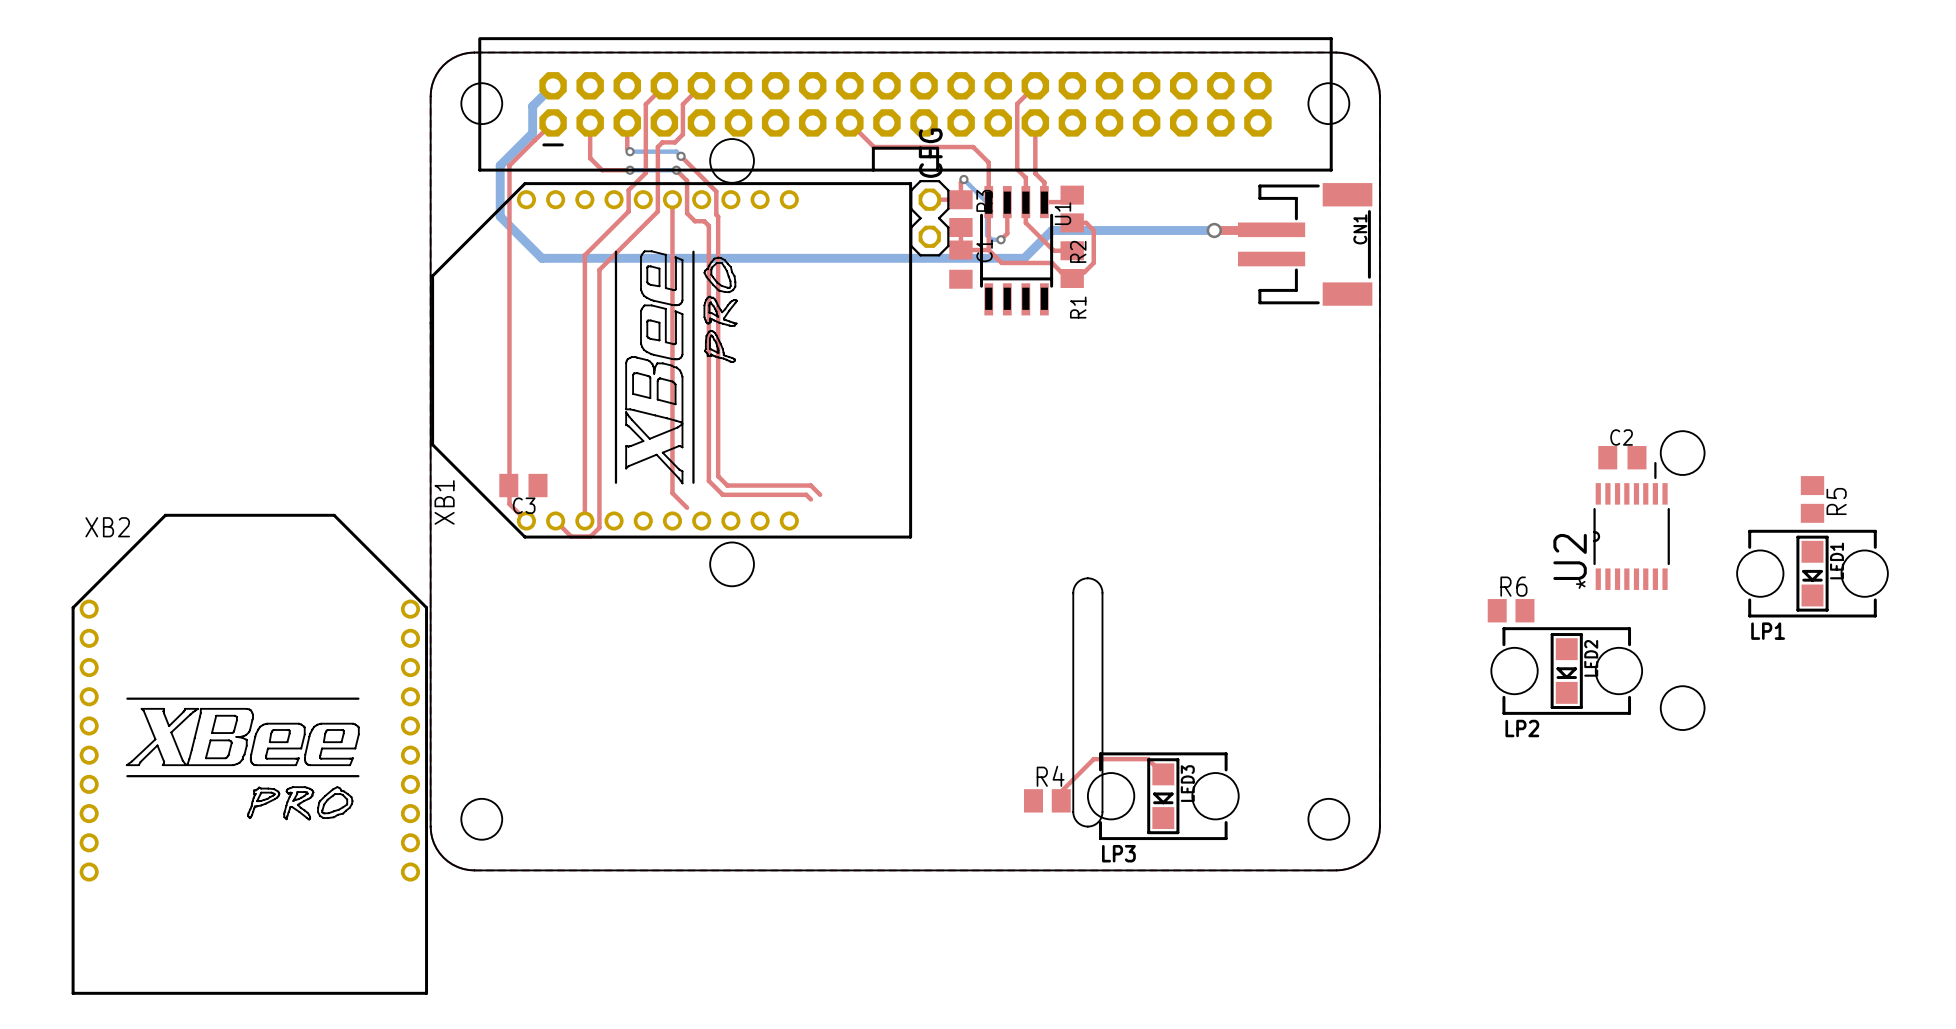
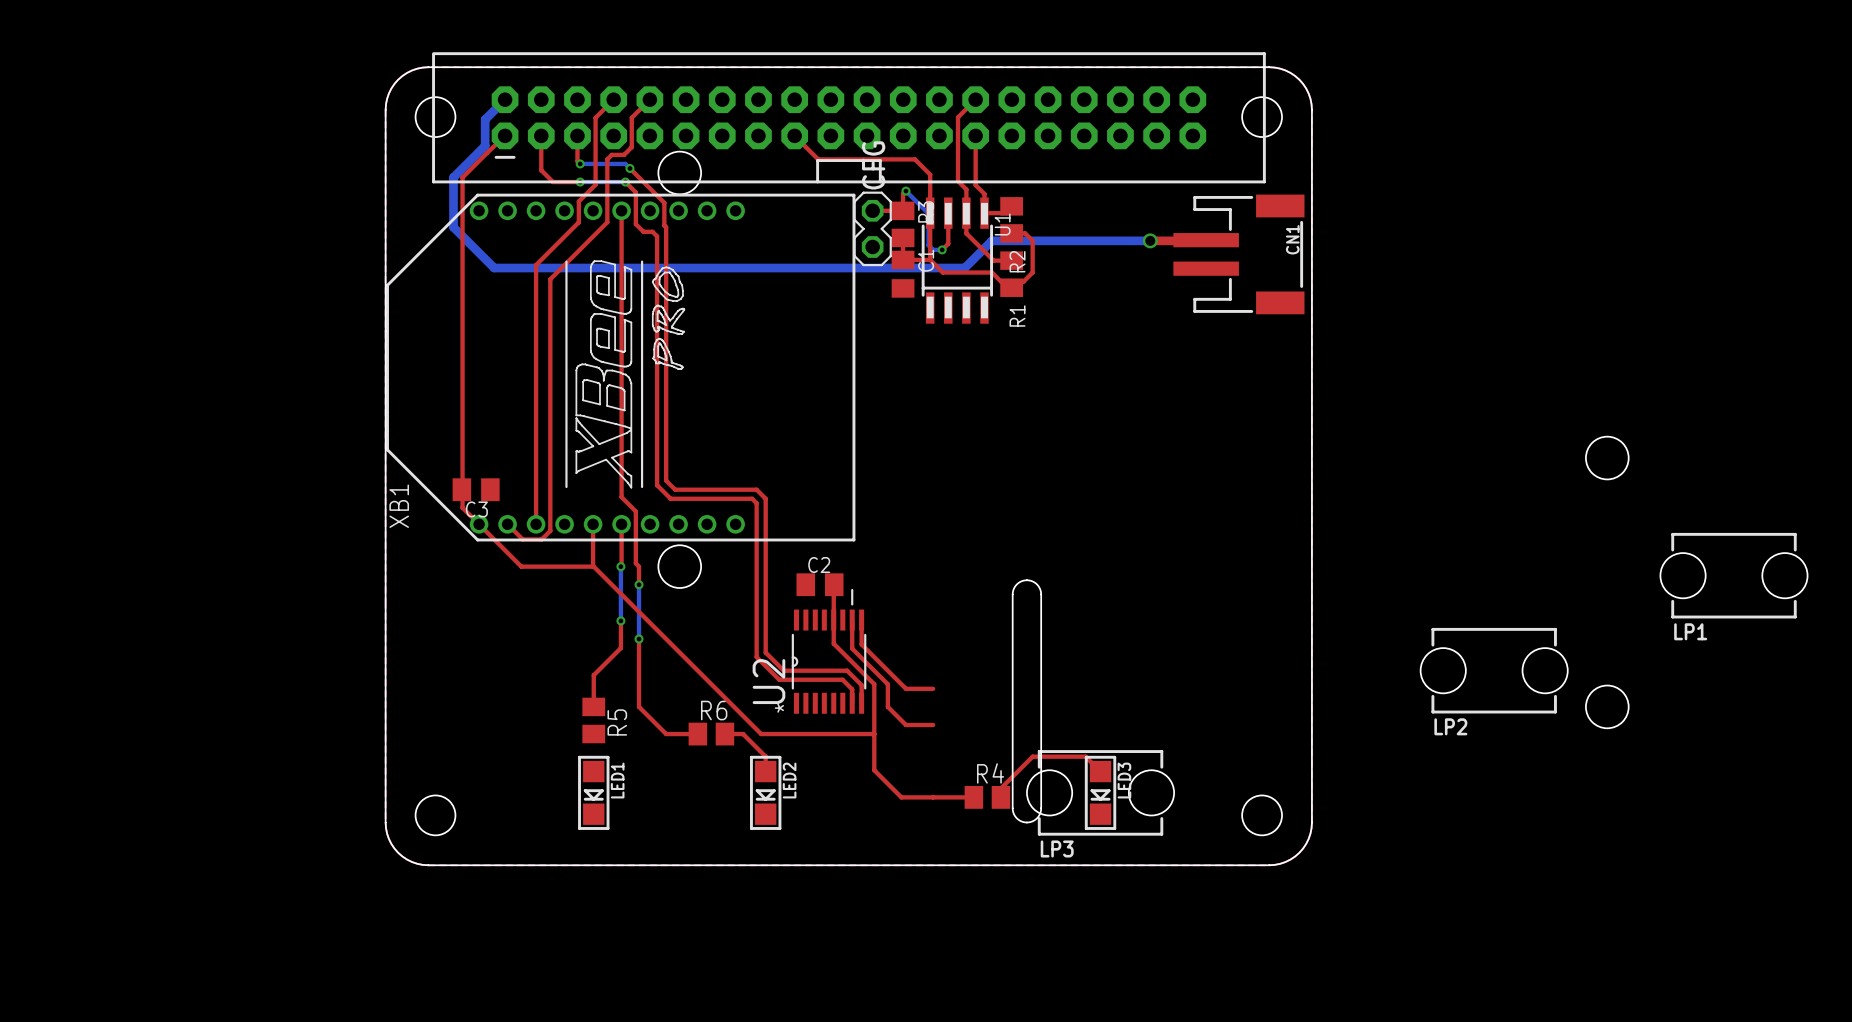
C2 position: (1622, 457) -> (820, 584)
top track: none -> (765, 498) (765, 652) (783, 670) (847, 670) (861, 685) (861, 703)
top track: none -> (756, 503) (756, 657) (779, 679) (842, 679) (852, 689) (852, 703)
R5 position: (1812, 499) -> (593, 720)
top track: none -> (635, 511) (635, 563) (639, 566) (639, 584)
top track: none -> (479, 524) (521, 566) (593, 566) (593, 524)
top track: none -> (621, 524) (620, 566)
U2 position: (1631, 525) -> (829, 651)
top track: none -> (593, 565) (761, 734) (874, 734)
bottom track: none -> (620, 566) (620, 620)
via: none -> (620, 566)
LED1 position: (1812, 573) -> (593, 792)
bottom track: none -> (639, 584) (639, 639)
via: none -> (639, 584)
top track: none -> (834, 584) (833, 643) (874, 684) (874, 770) (901, 797) (973, 797)
R6 position: (1511, 610) -> (711, 734)
top track: none -> (852, 620) (852, 648) (887, 684) (887, 706) (905, 725) (933, 725)
top track: none -> (861, 620) (861, 644) (905, 688) (933, 688)
top track: none -> (620, 620) (620, 648) (593, 675) (593, 706)
via: none -> (620, 620)
top track: none -> (639, 639) (639, 706) (666, 734) (697, 734)
via: none -> (639, 639)
LED2 position: (1566, 671) -> (765, 792)
top track: none -> (724, 734) (743, 734) (765, 756) (765, 771)
XB2: (249, 754) -> none

